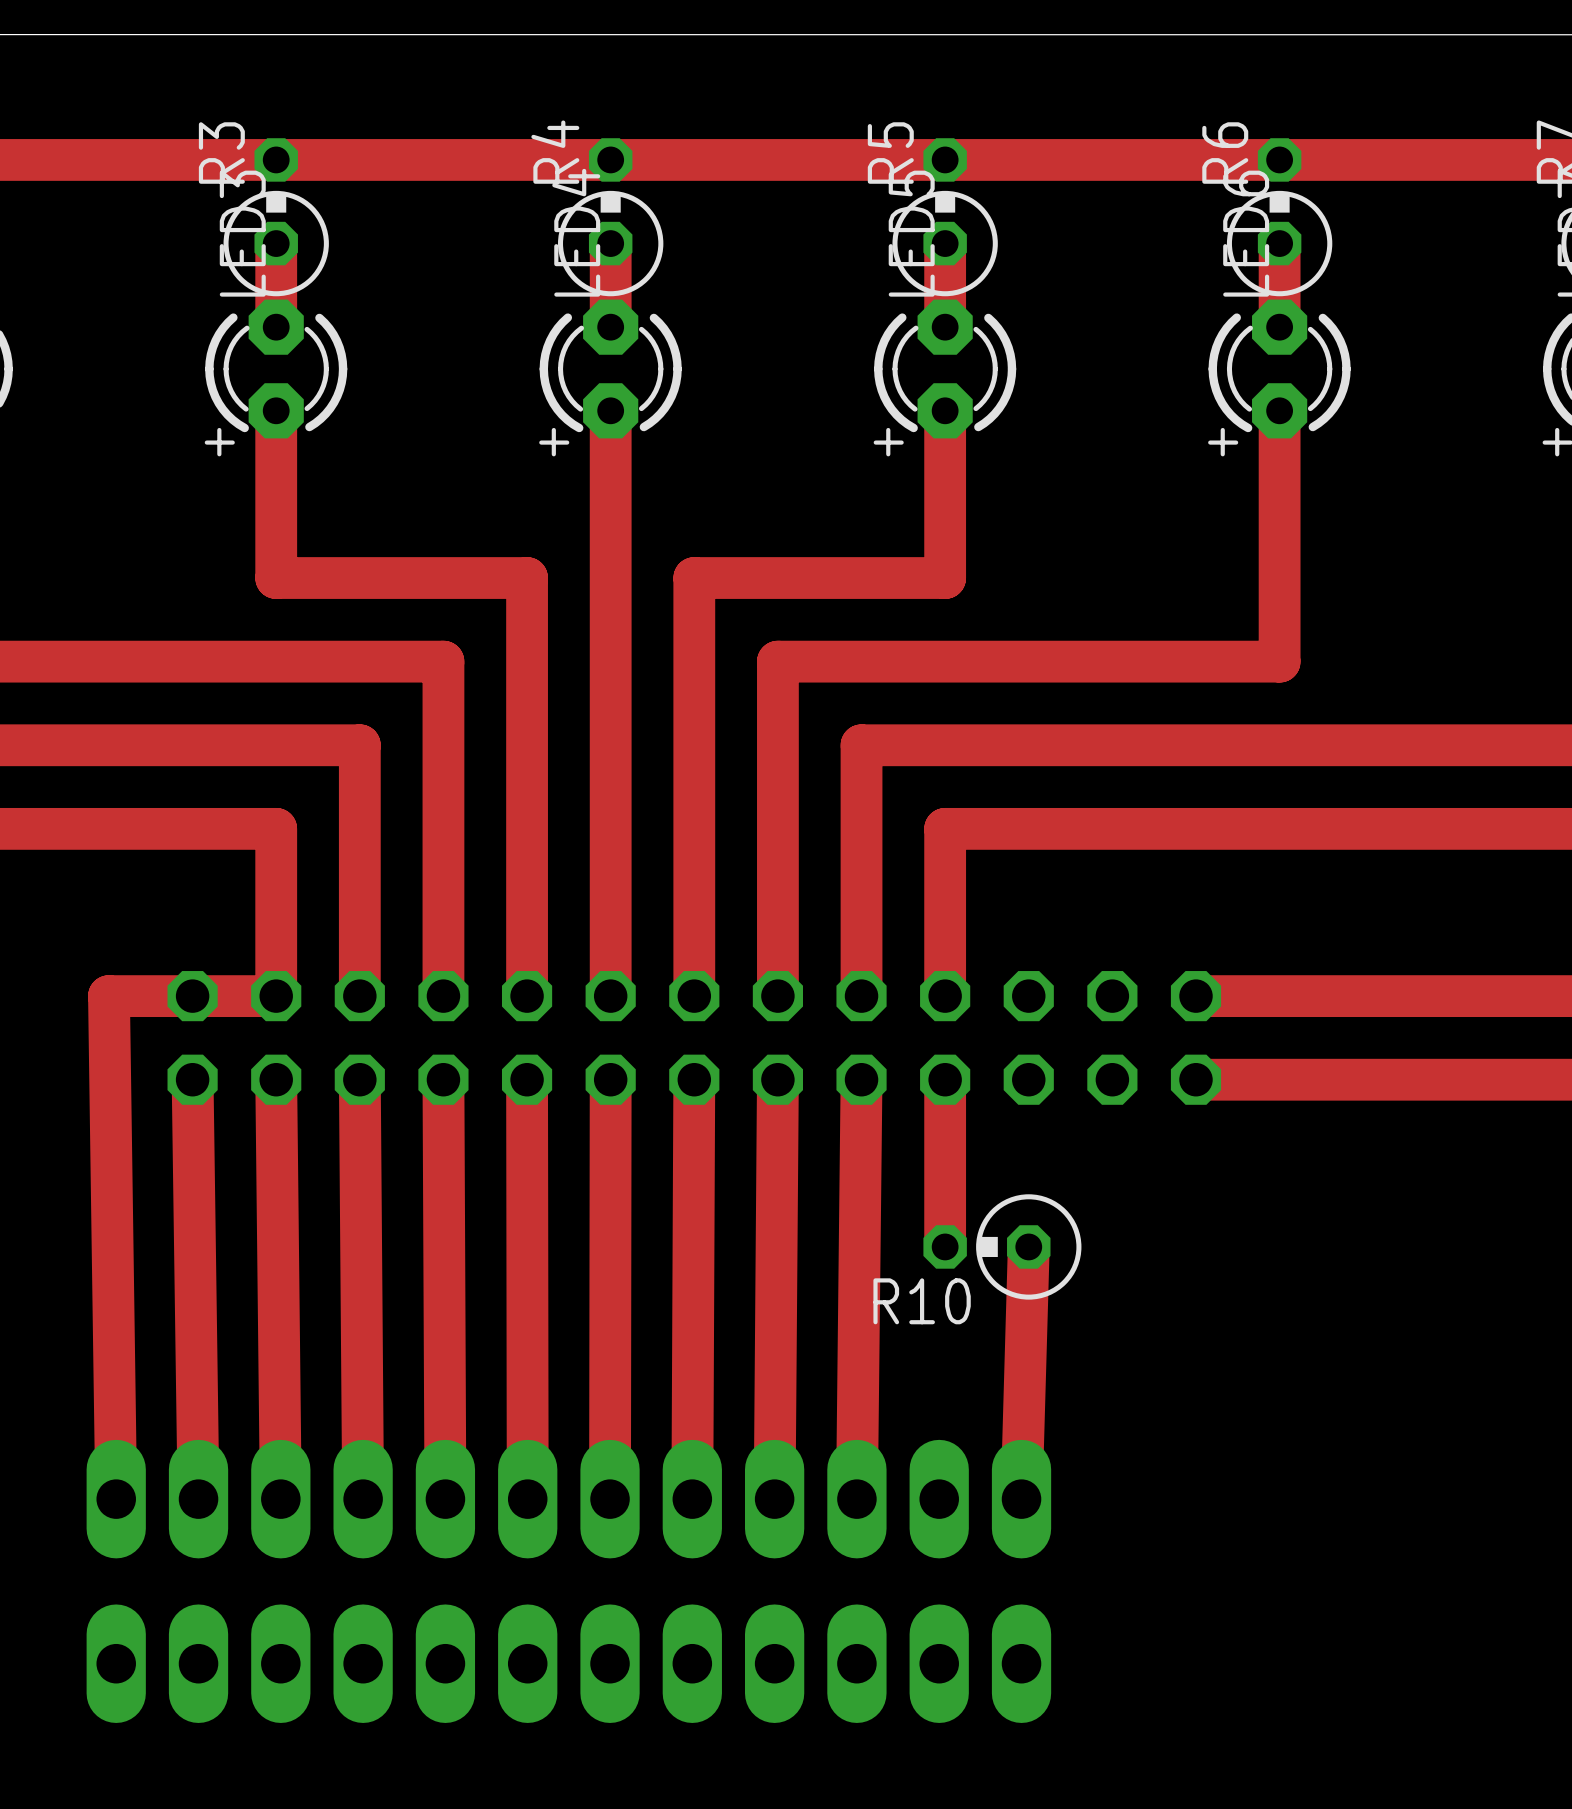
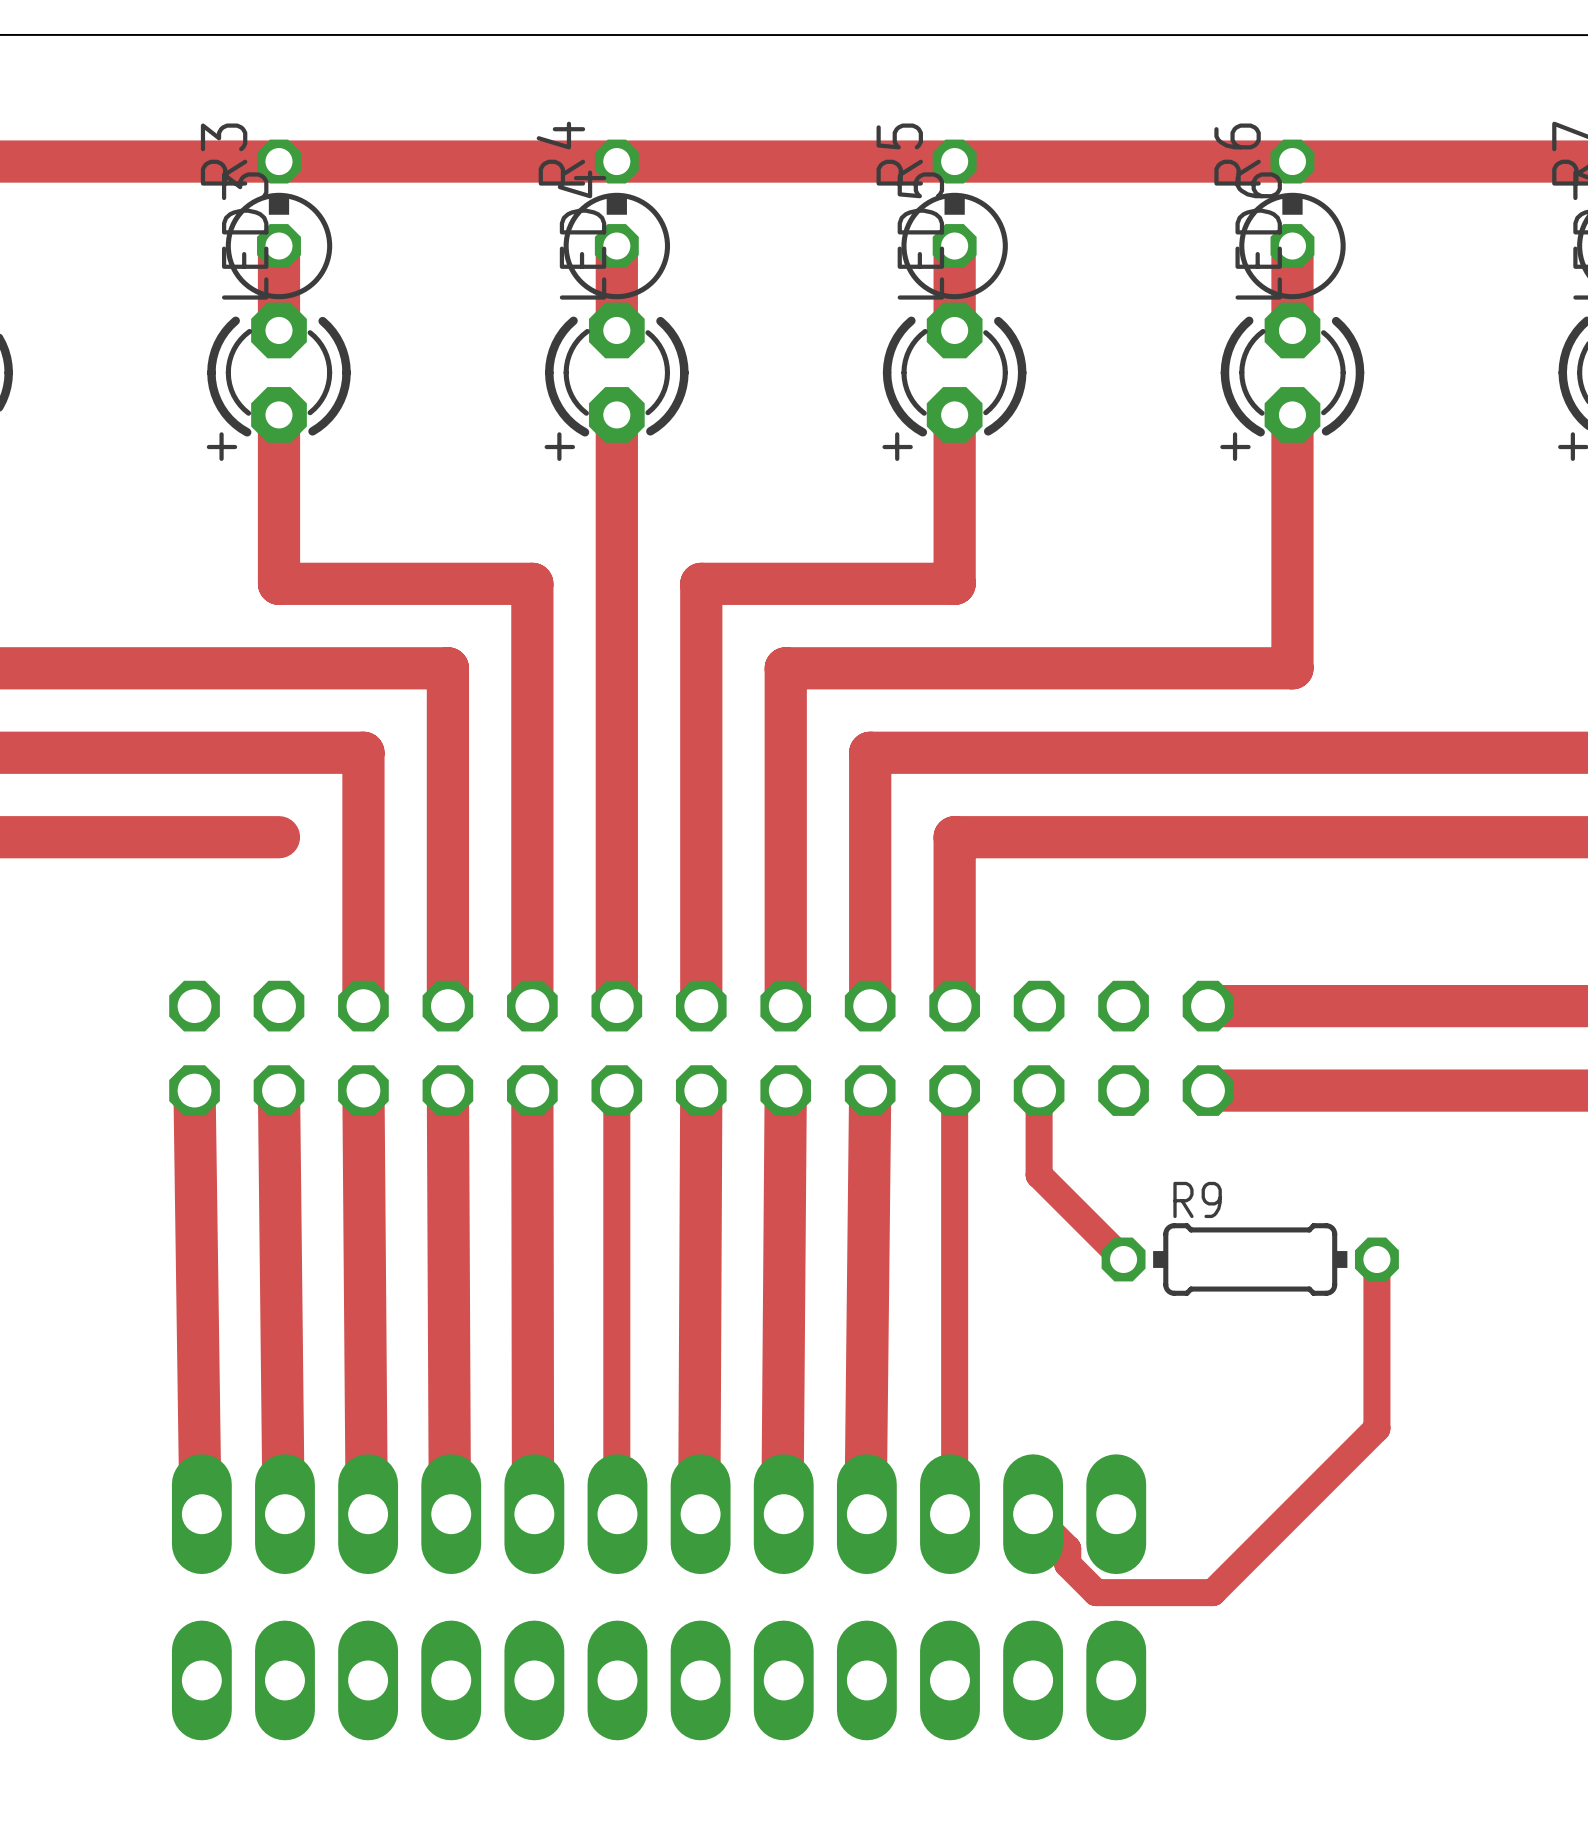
track: (276, 828) (276, 996) (108, 996) (116, 1499) -> none
track: (610, 1079) (610, 1499) -> (616, 1090) (616, 1555) (617, 1514)
track width: thick (945, 1079) (945, 1246) -> thin (954, 1090) (954, 1259)
track: none -> (1039, 1090) (1039, 1175) (1123, 1259)
track: none -> (954, 1259) (954, 1509) (949, 1514)
R10: (1002, 1246) -> none
track: (1028, 1246) (1021, 1499) -> (1376, 1259) (1376, 1428) (1212, 1592) (1096, 1592) (1067, 1564) (1067, 1548) (1033, 1514)
R9: none -> (1250, 1259)
part position: (568, 1581) -> (659, 1597)

